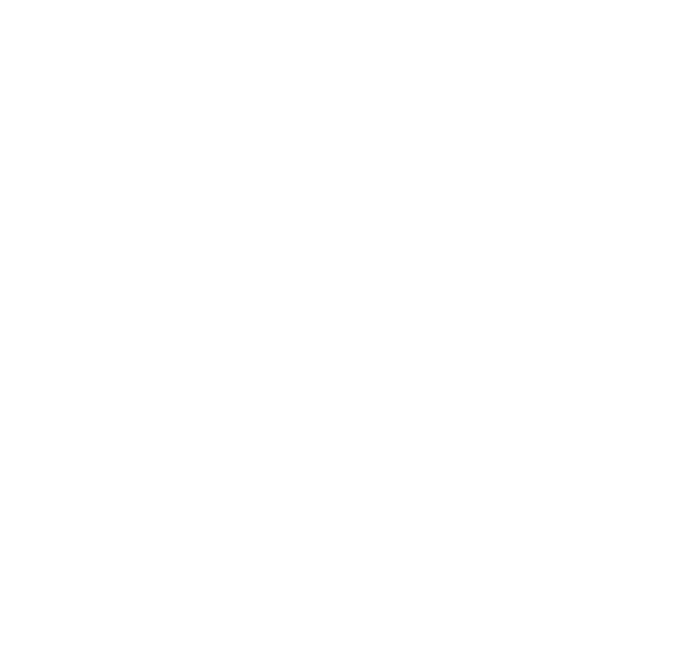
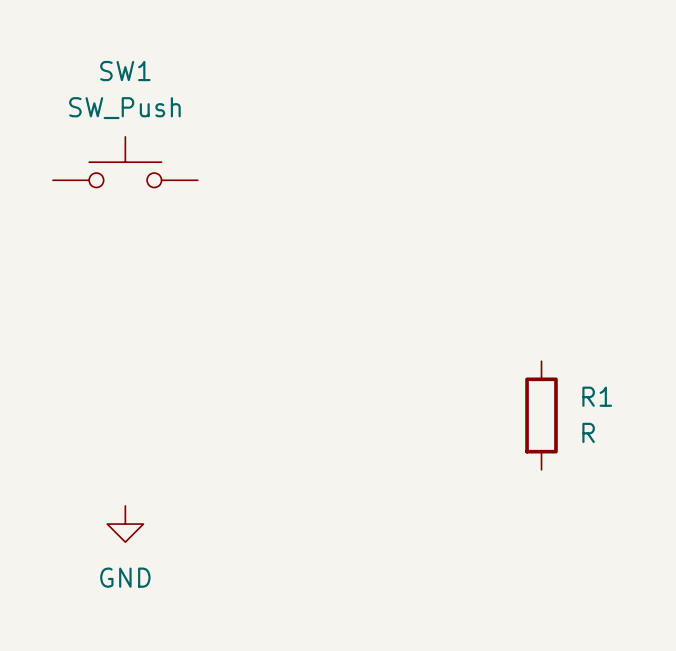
SW1: none -> SW_Push (125, 162)
R1: none -> R (541, 415)
power symbol: none -> GND (125, 524)

